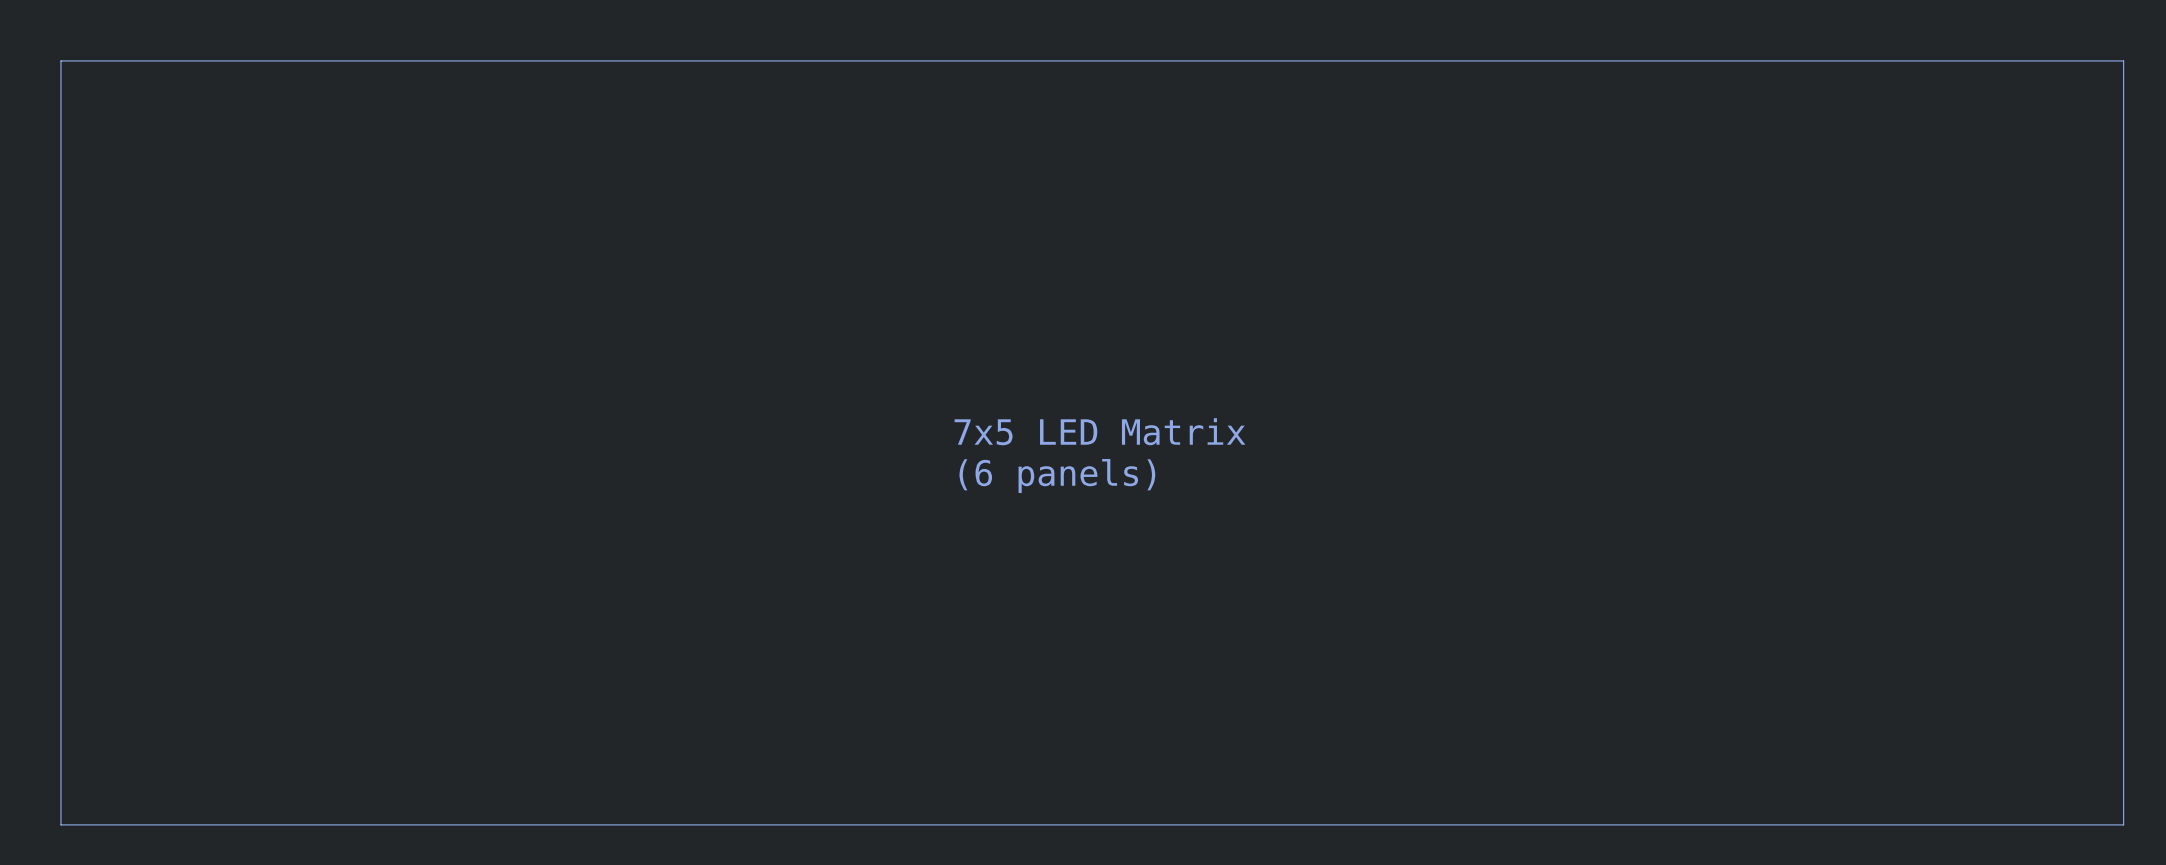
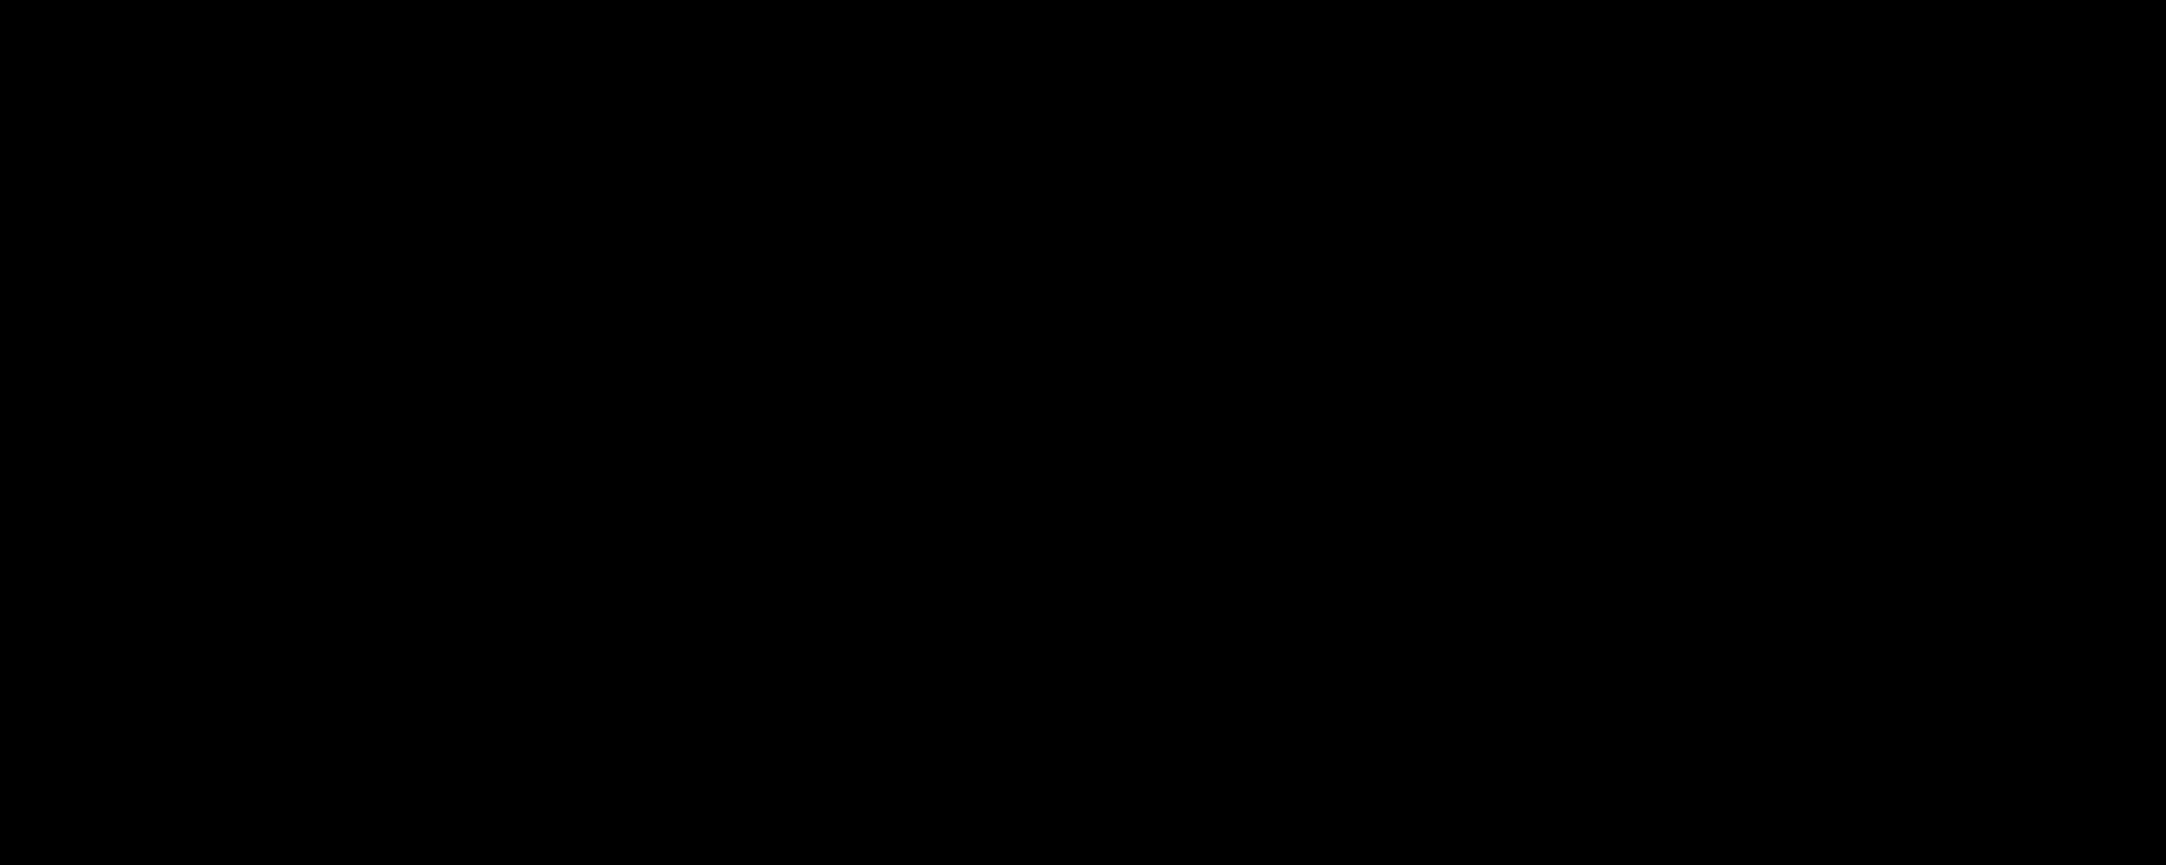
line: (60, 60) (2123, 60) (2123, 824) (60, 824) (60, 60) -> none
text: 7x5 LED Matrix (1099, 431) -> none
text: (6 panels) (1057, 476) -> none

